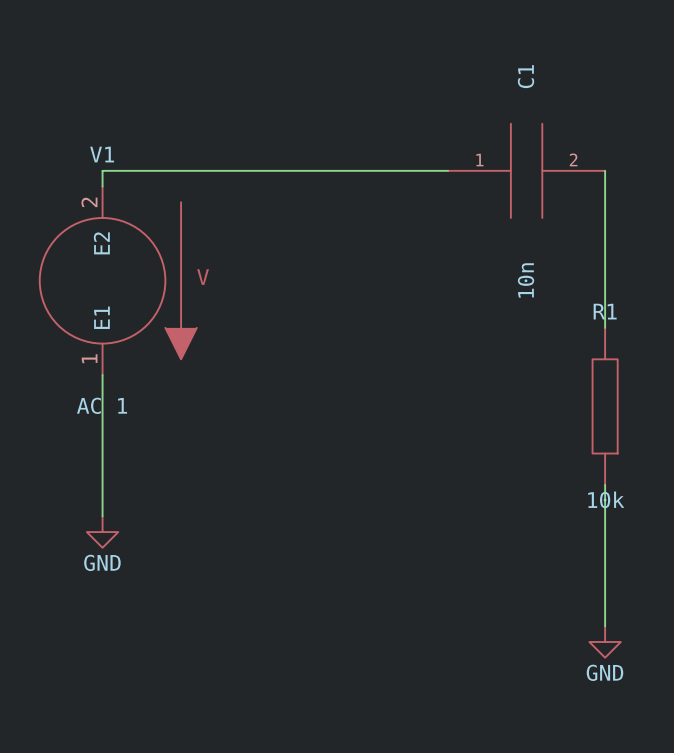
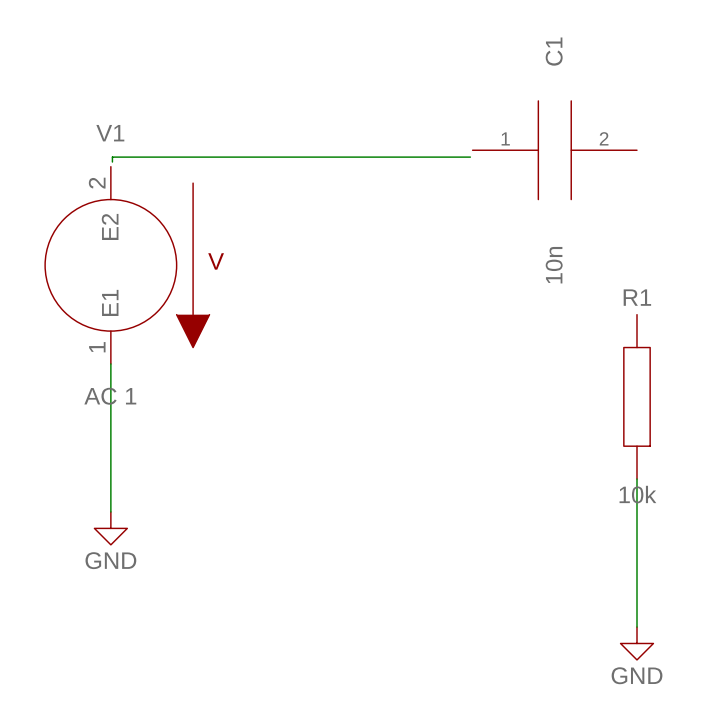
wire: (448, 170) (102, 170) (102, 186) -> none
wire: (605, 170) (605, 327) -> none
wire: none -> (470, 157) (112, 157) (112, 162)

